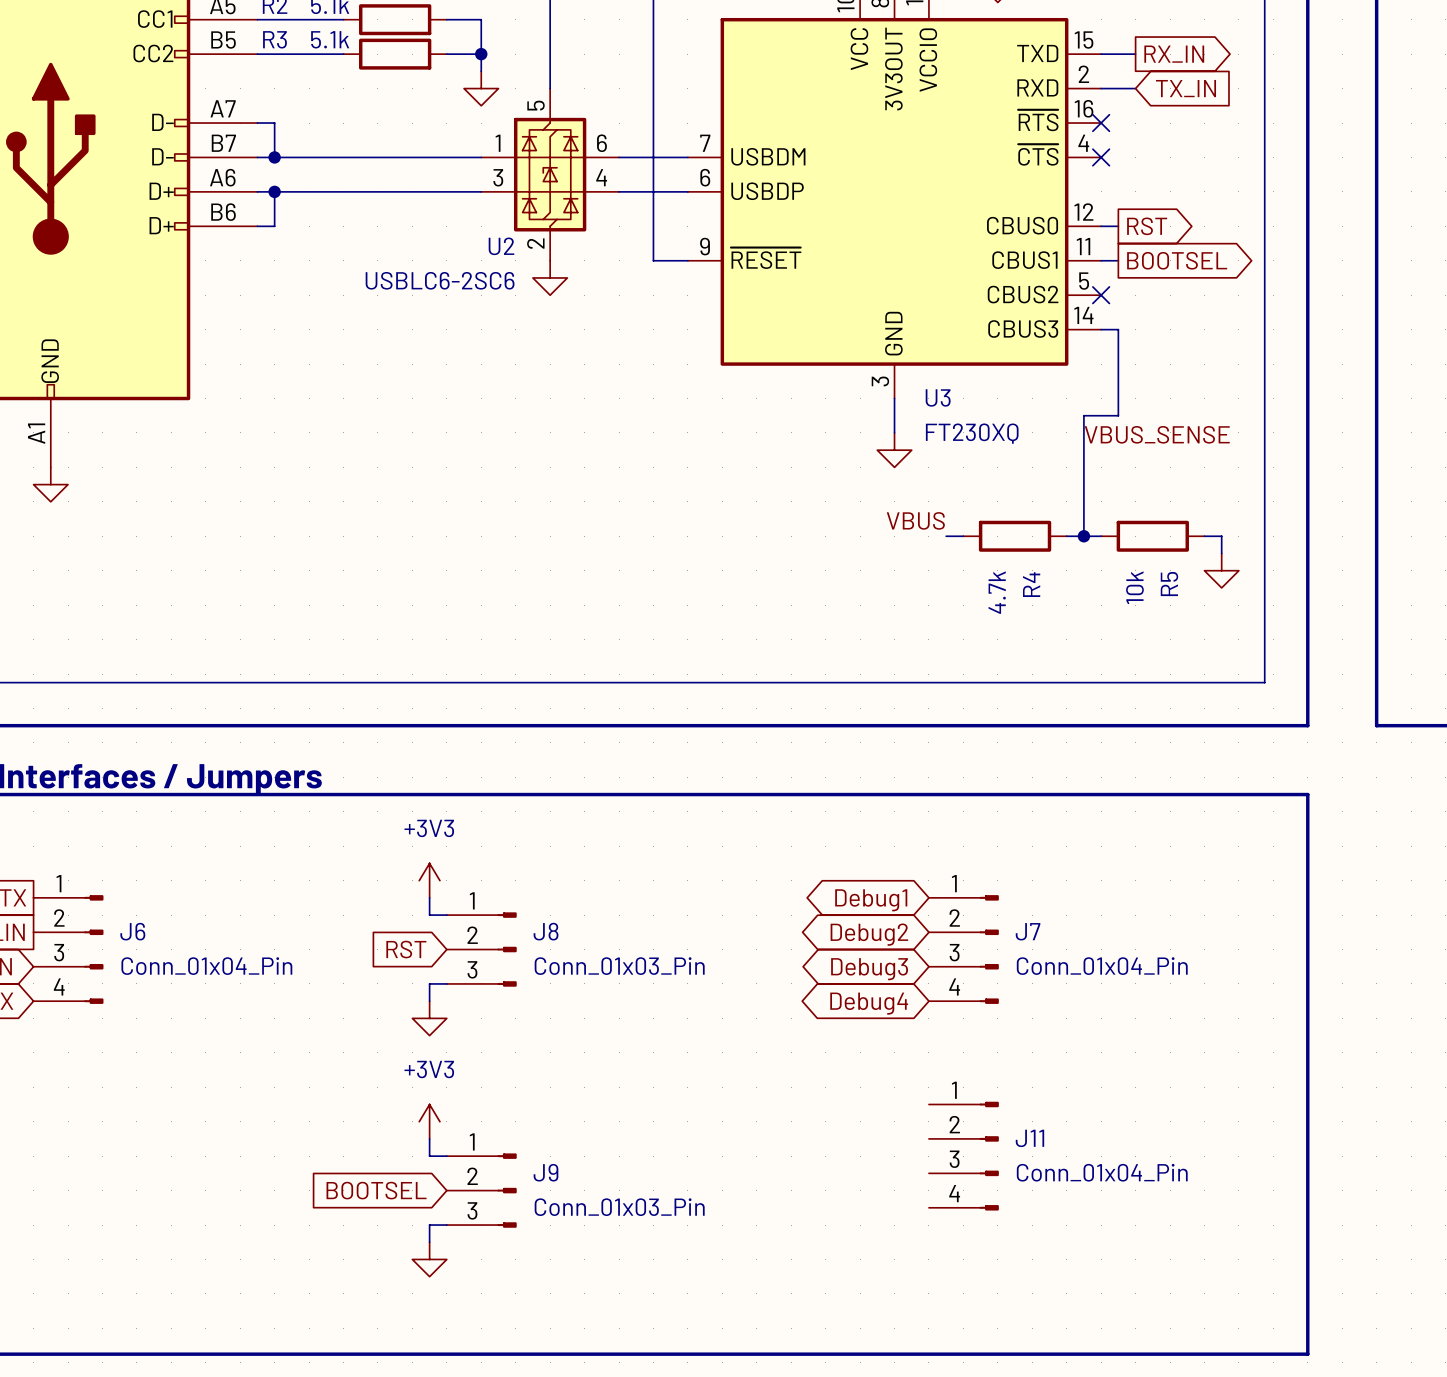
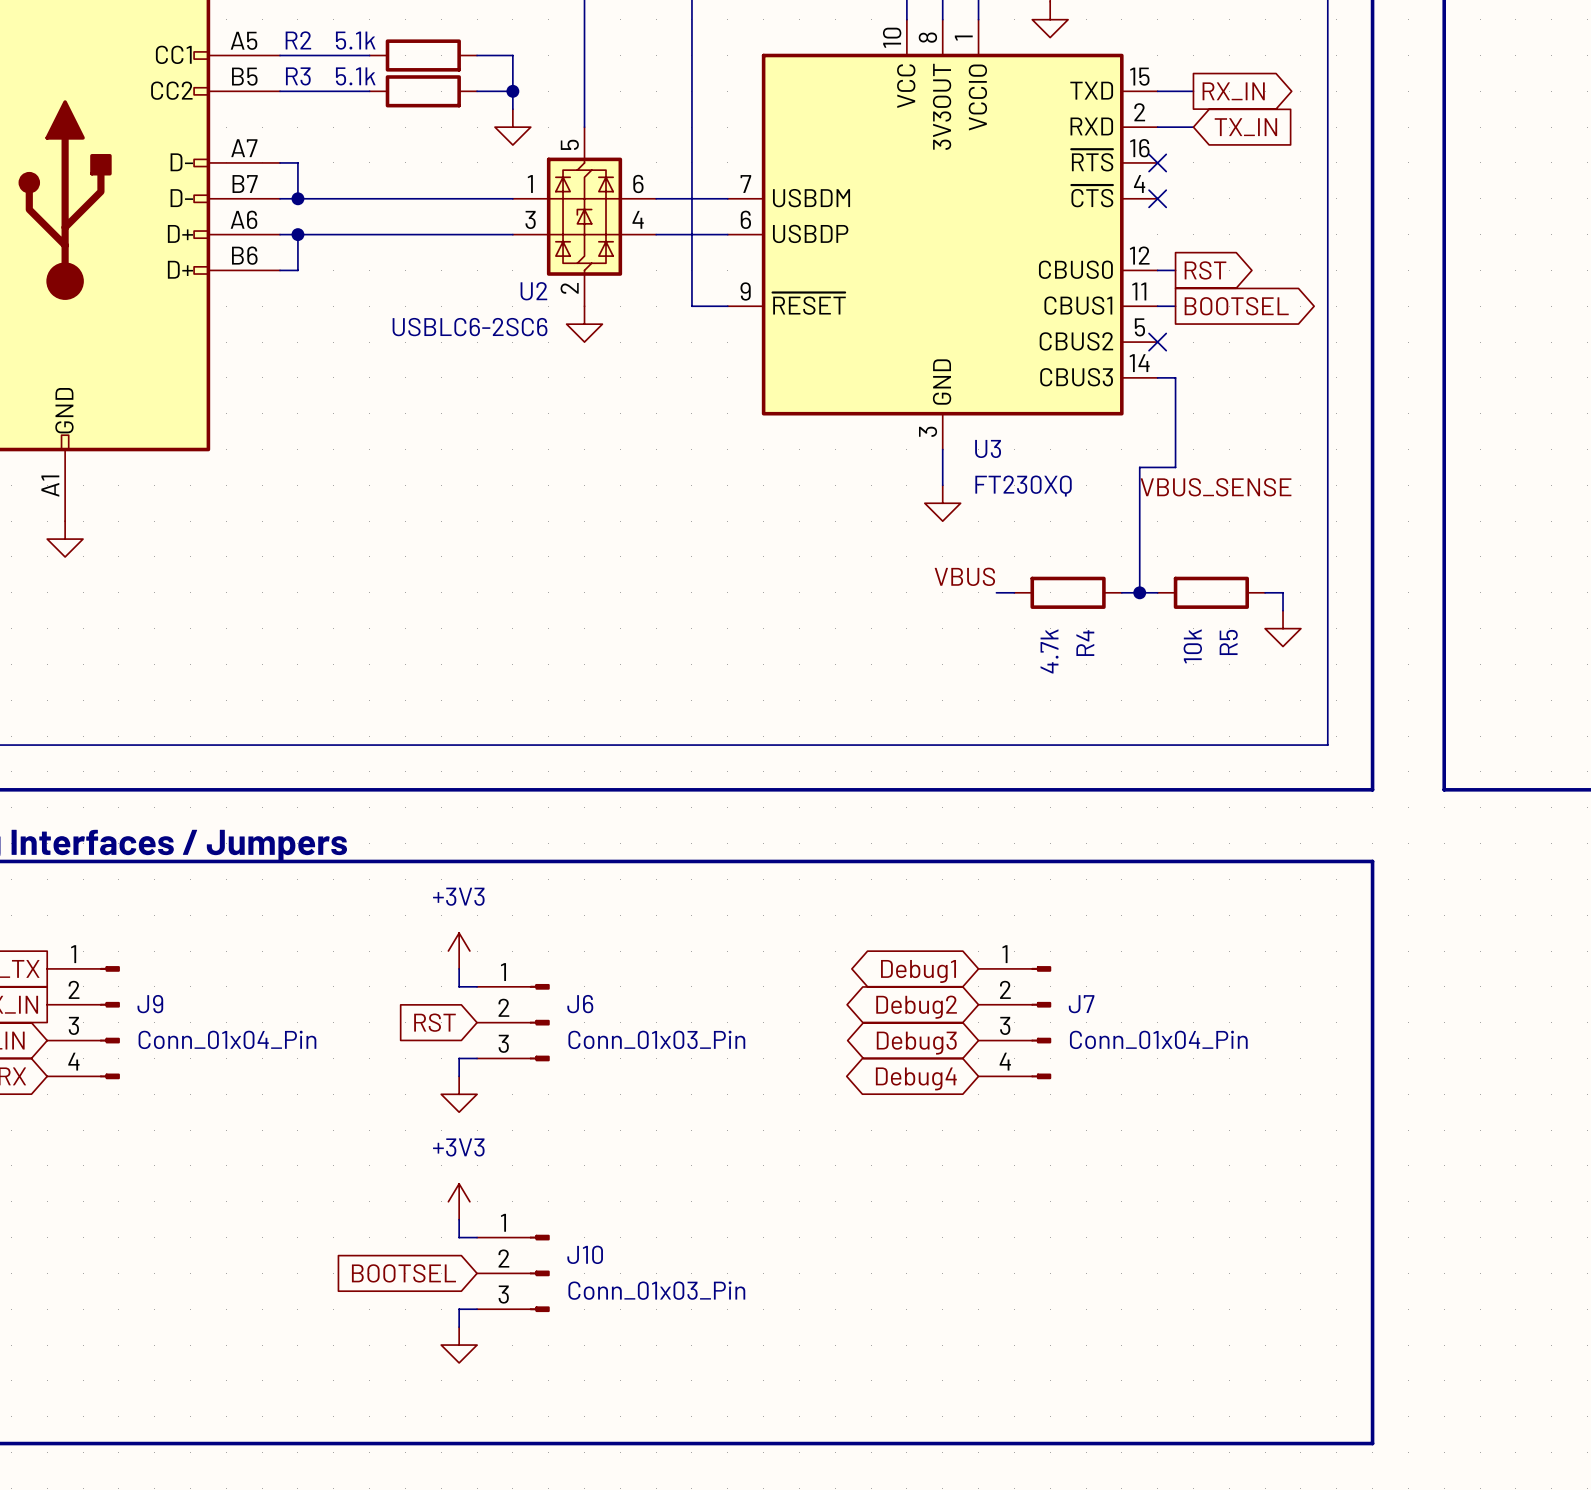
J6 name: J6 (132, 931) -> J9 (150, 1004)
J8 name: J8 (546, 931) -> J6 (580, 1004)
J11: Conn_01x04_Pin (963, 1156) -> none
J9 name: J9 (545, 1172) -> J10 (585, 1254)

